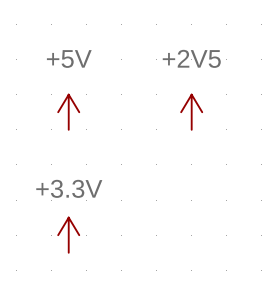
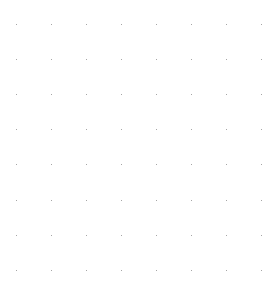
power symbol: +5V (68, 112) -> none
power symbol: +2V5 (191, 112) -> none
power symbol: +3.3V (68, 235) -> none

